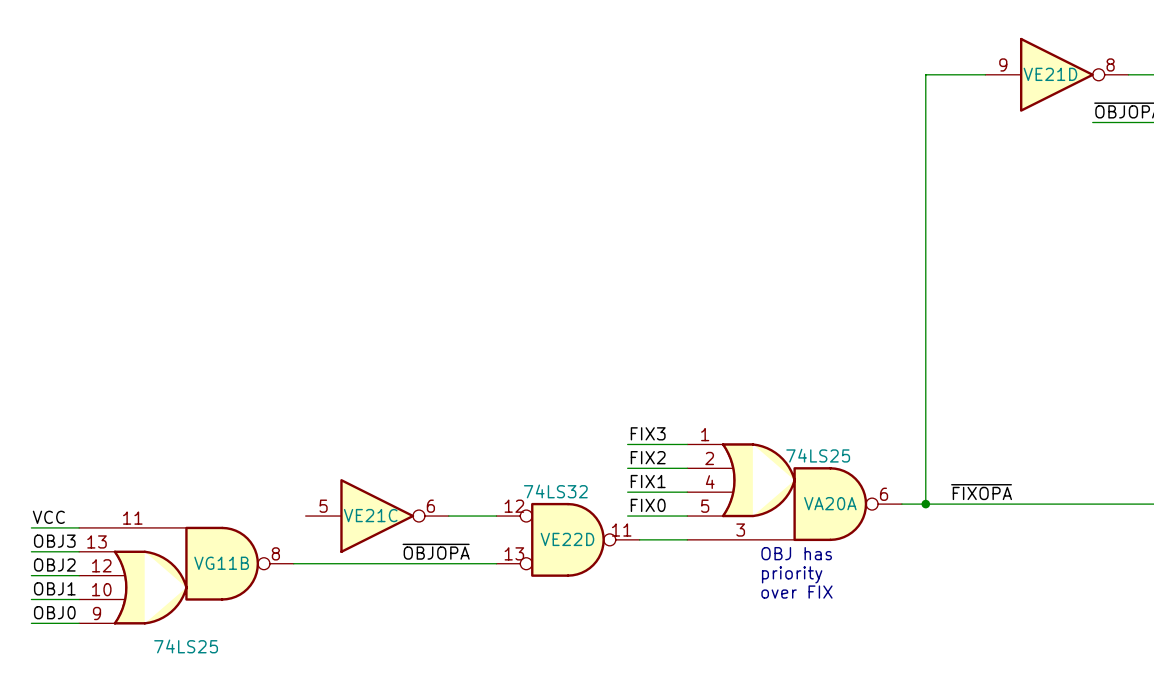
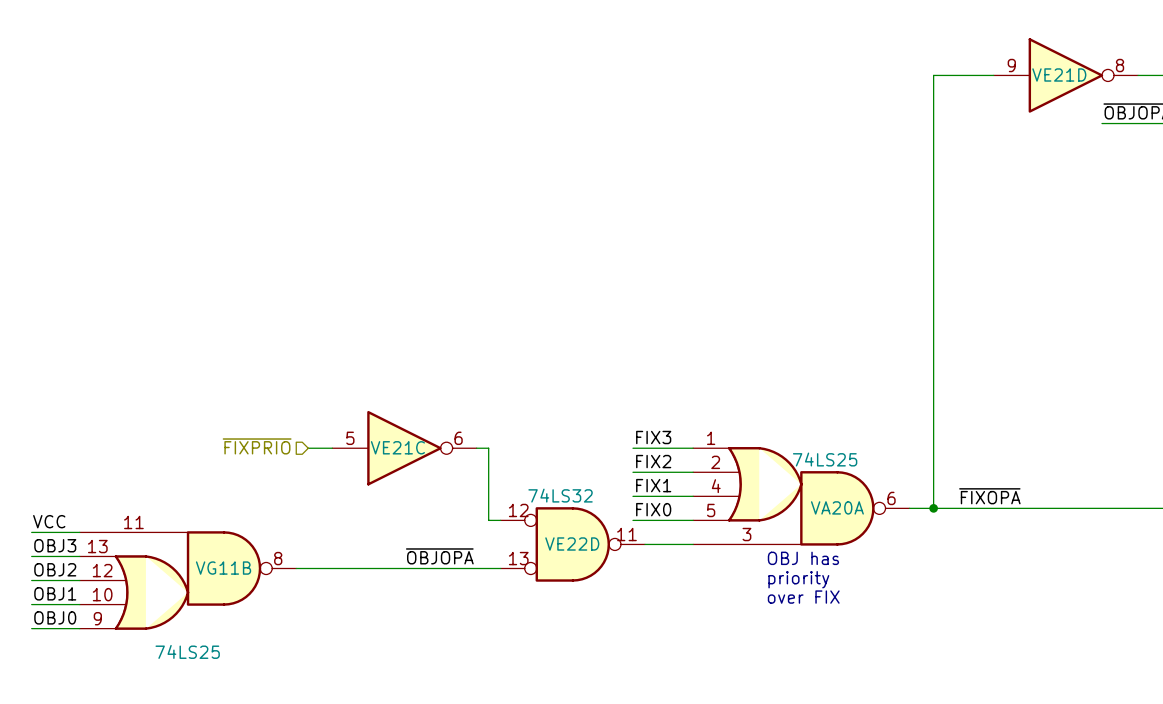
hierarchical label: none -> ~{FIXPRIO} (257, 446)
wire: none -> (308, 448) (332, 448)
VE21C position: (377, 516) -> (404, 448)
wire: (448, 516) (484, 516) -> (476, 448) (488, 448) (488, 520)

